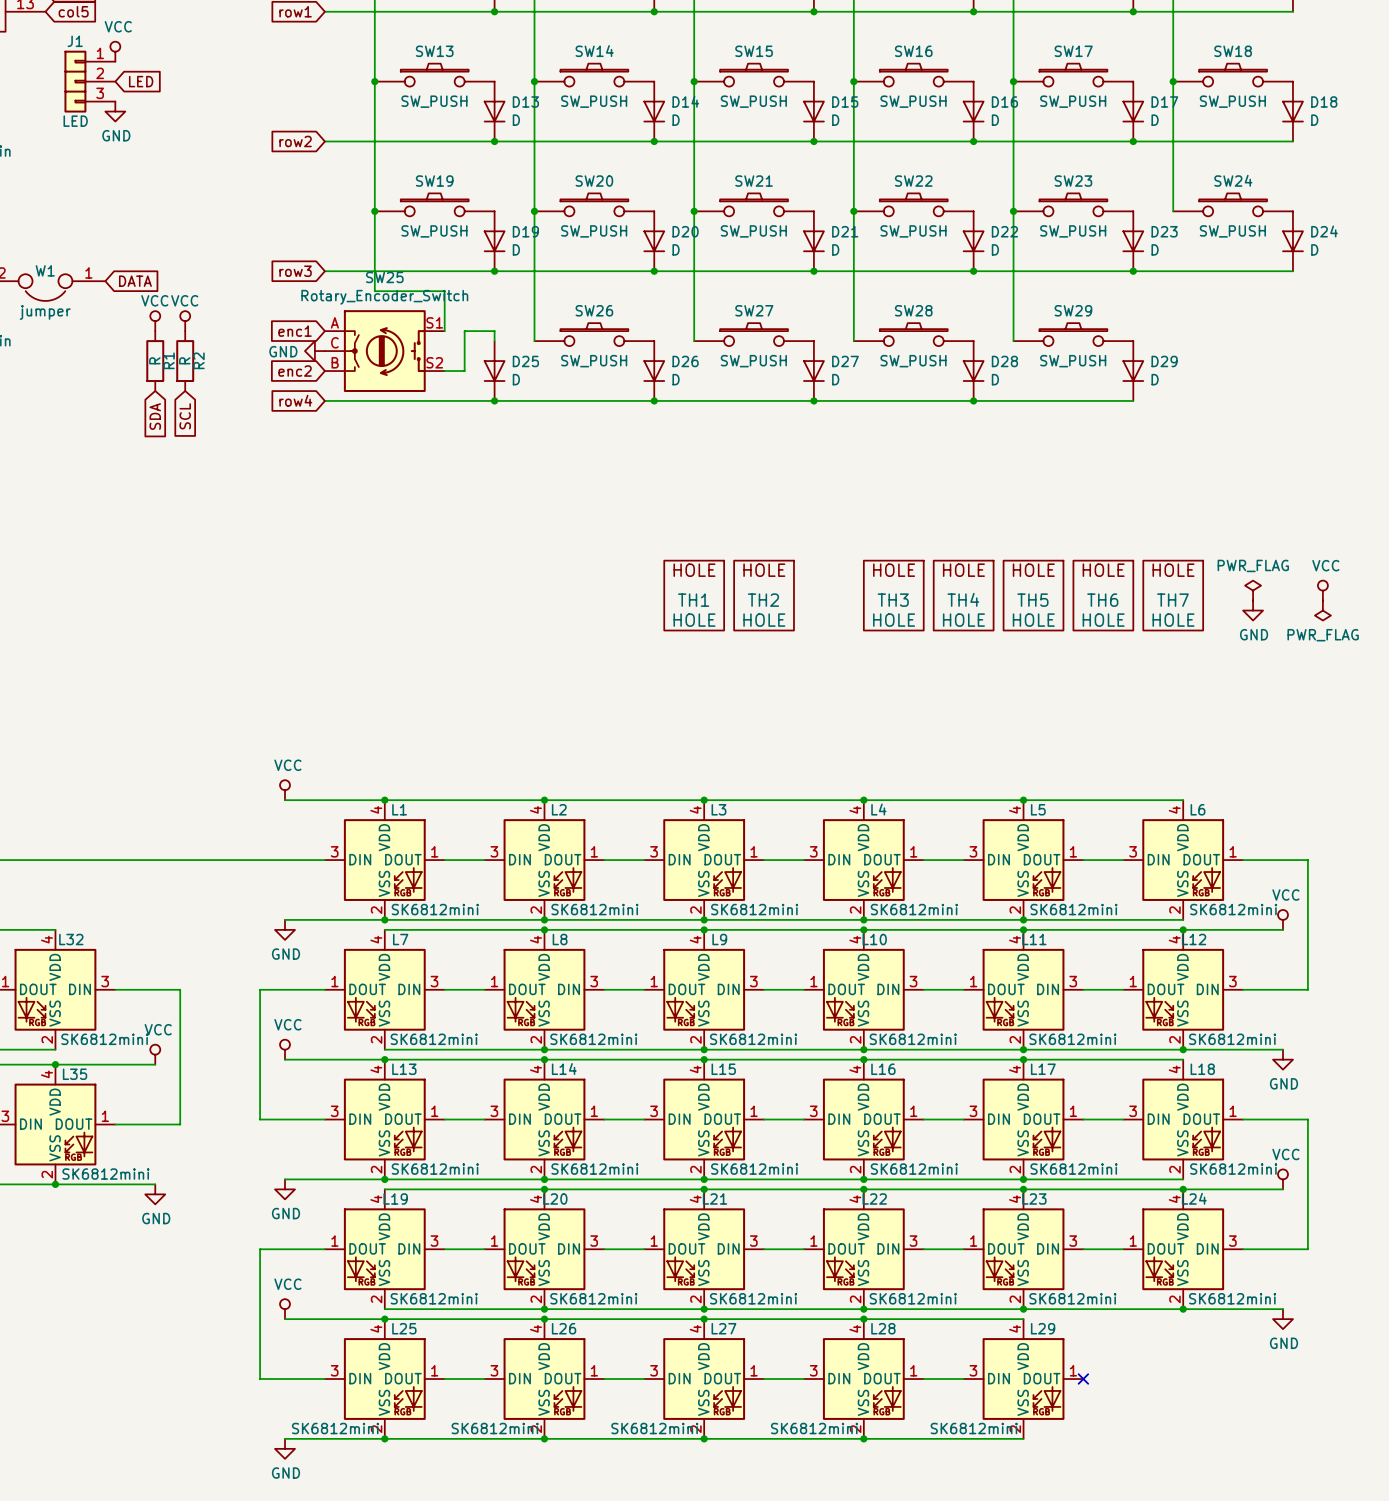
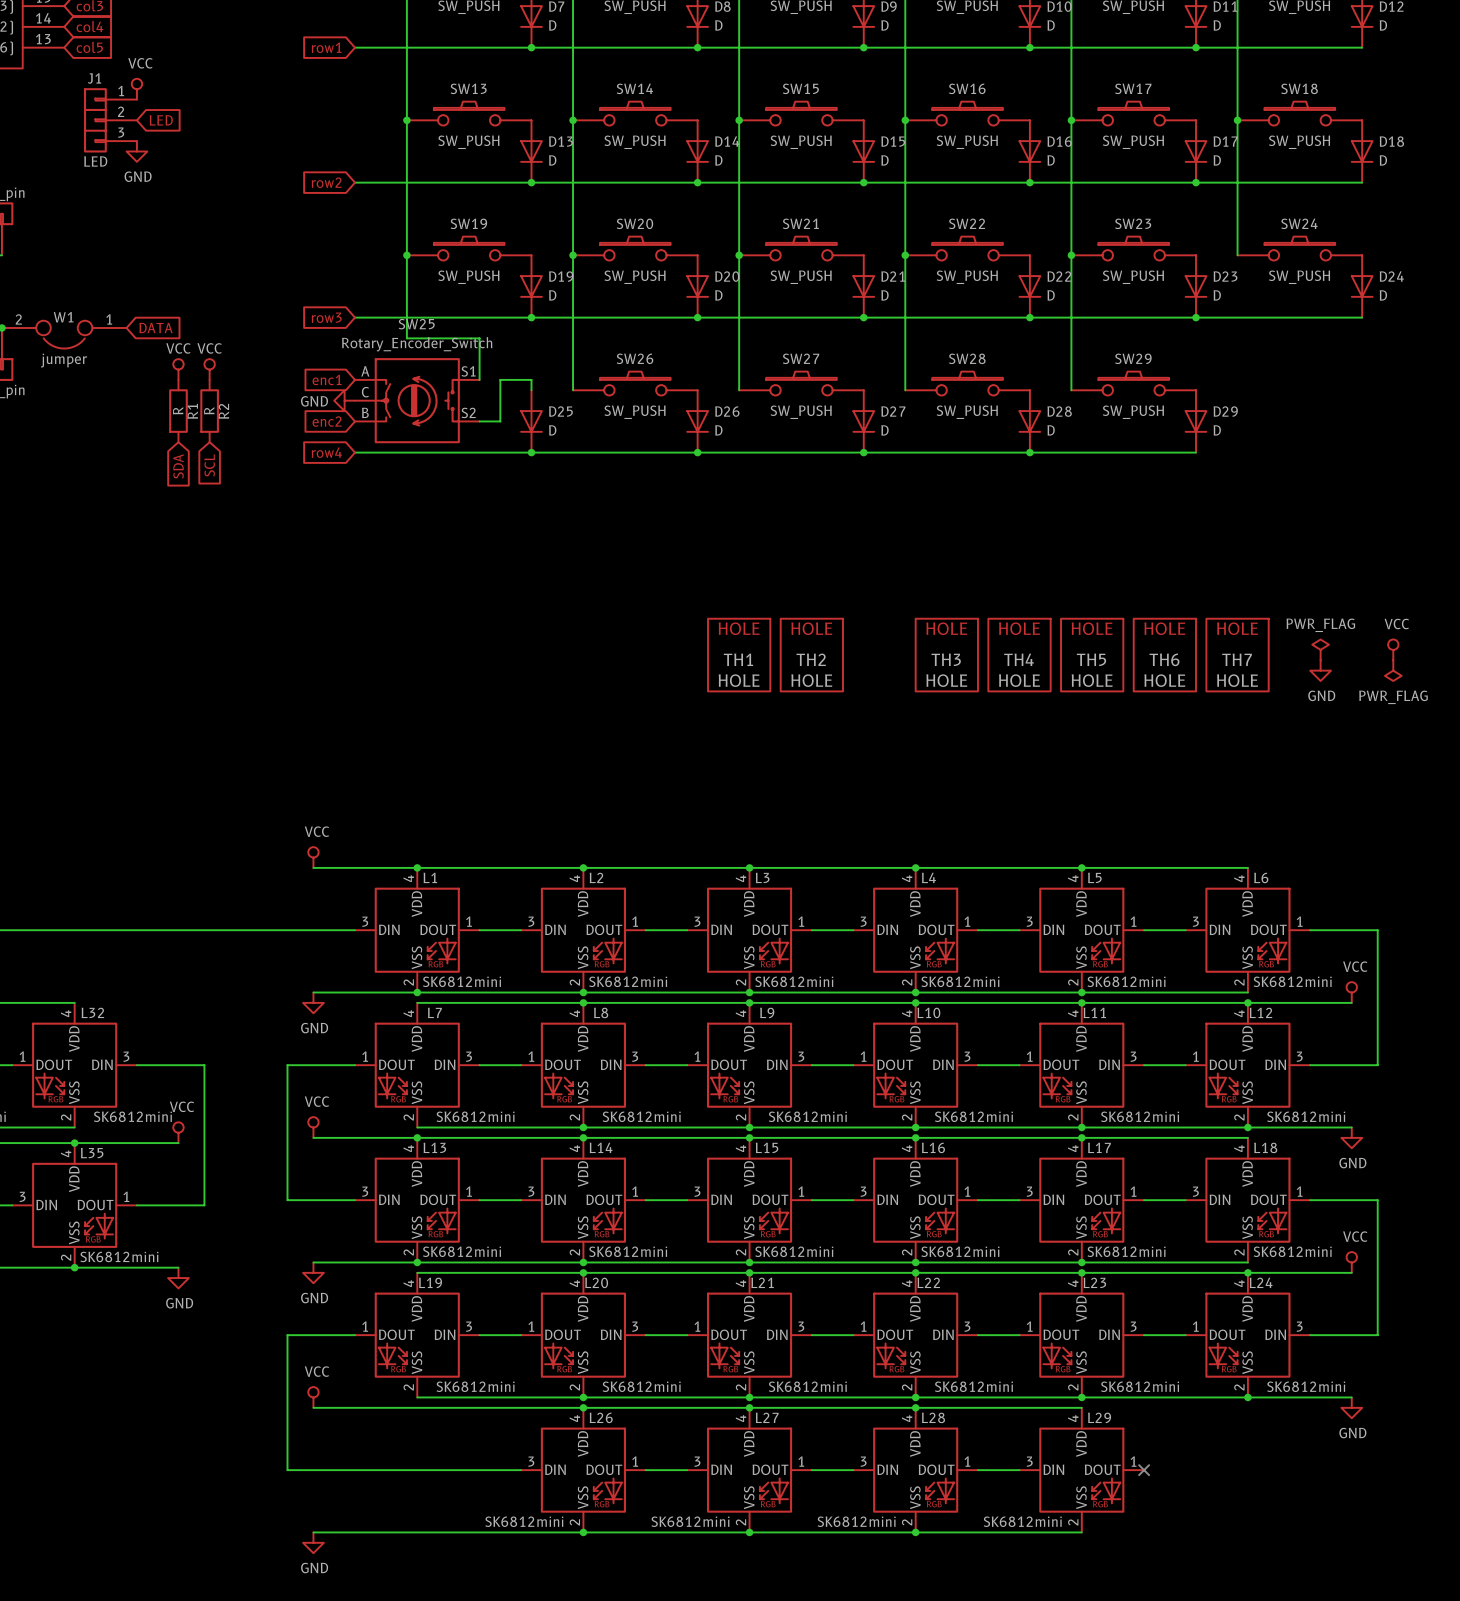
junction: (384, 1319) -> none
L25: SK6812mini (384, 1379) -> none
junction: (384, 1438) -> none

